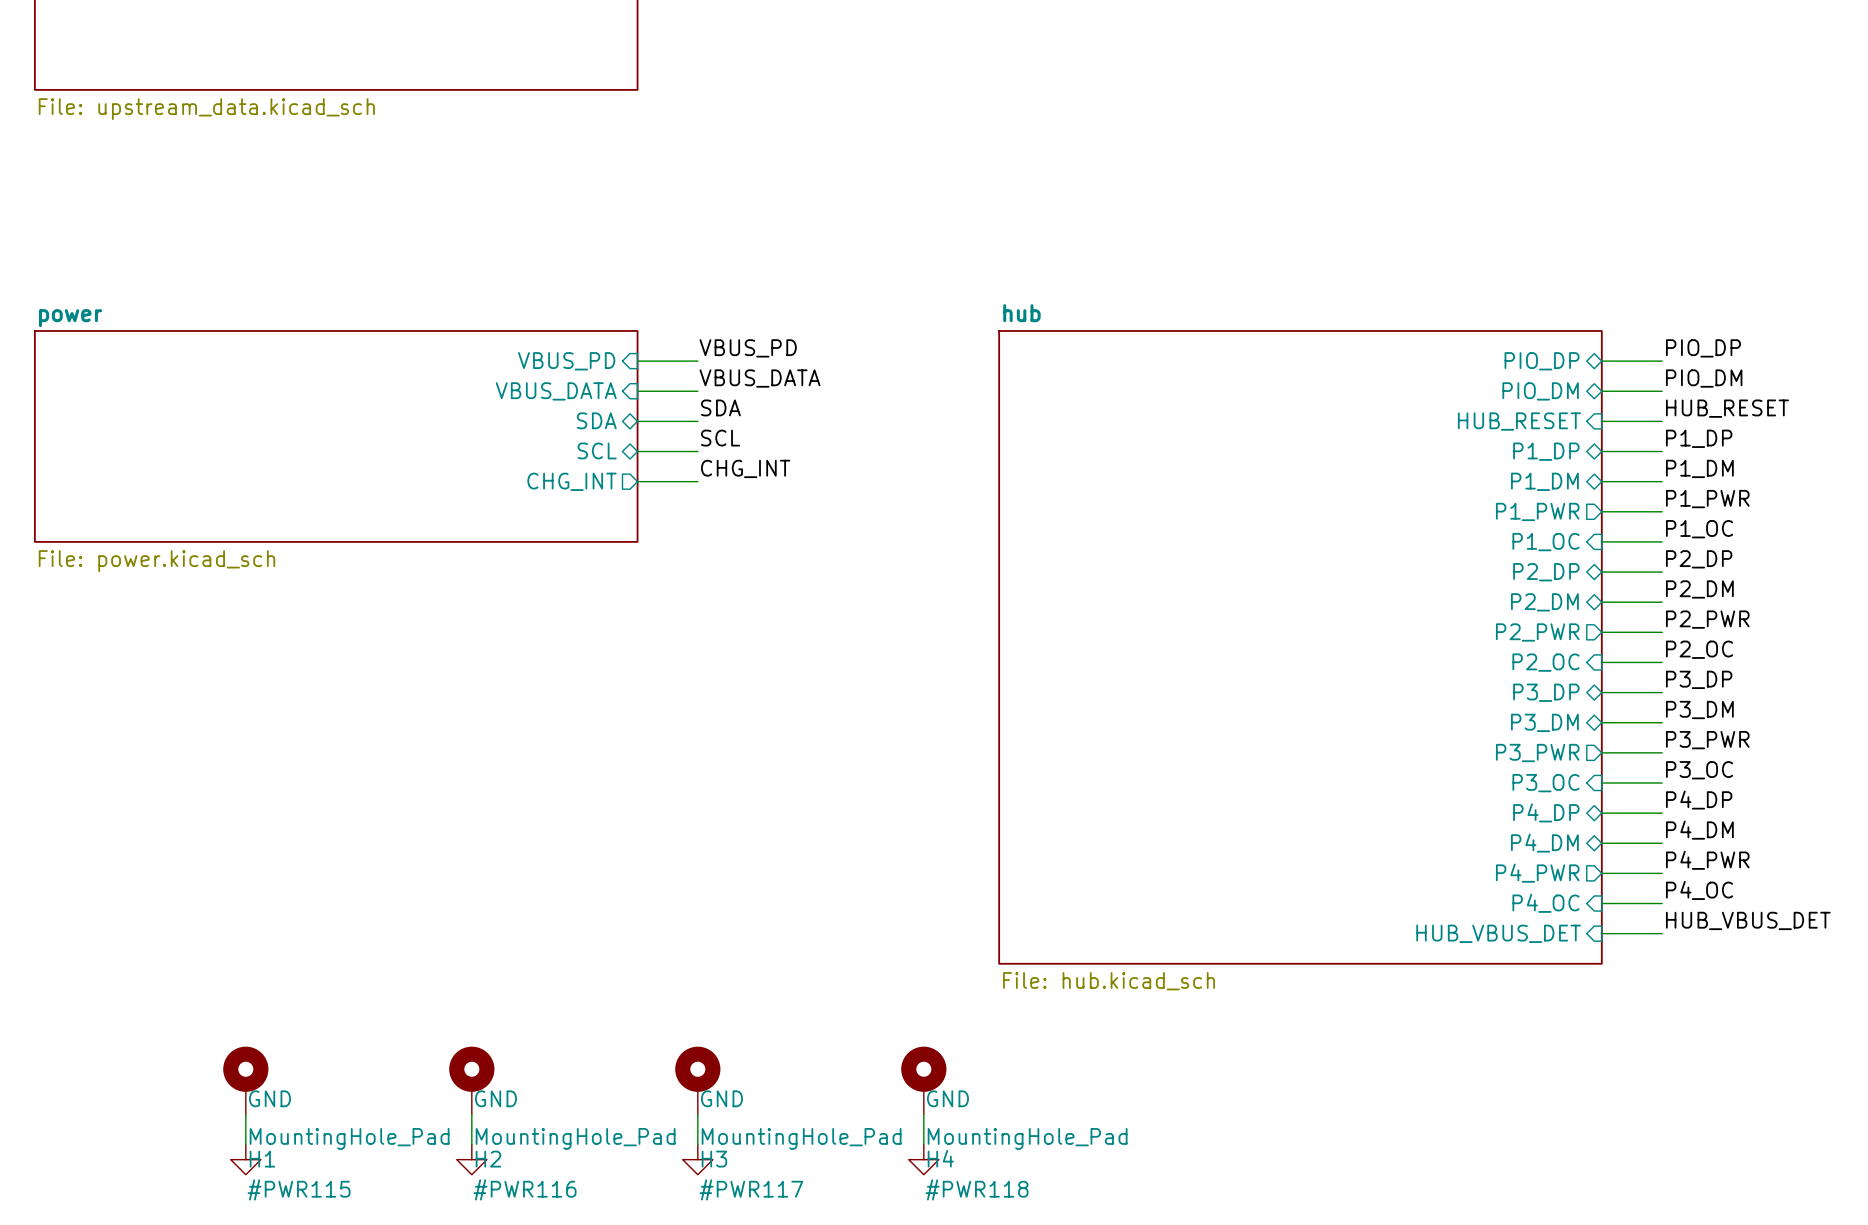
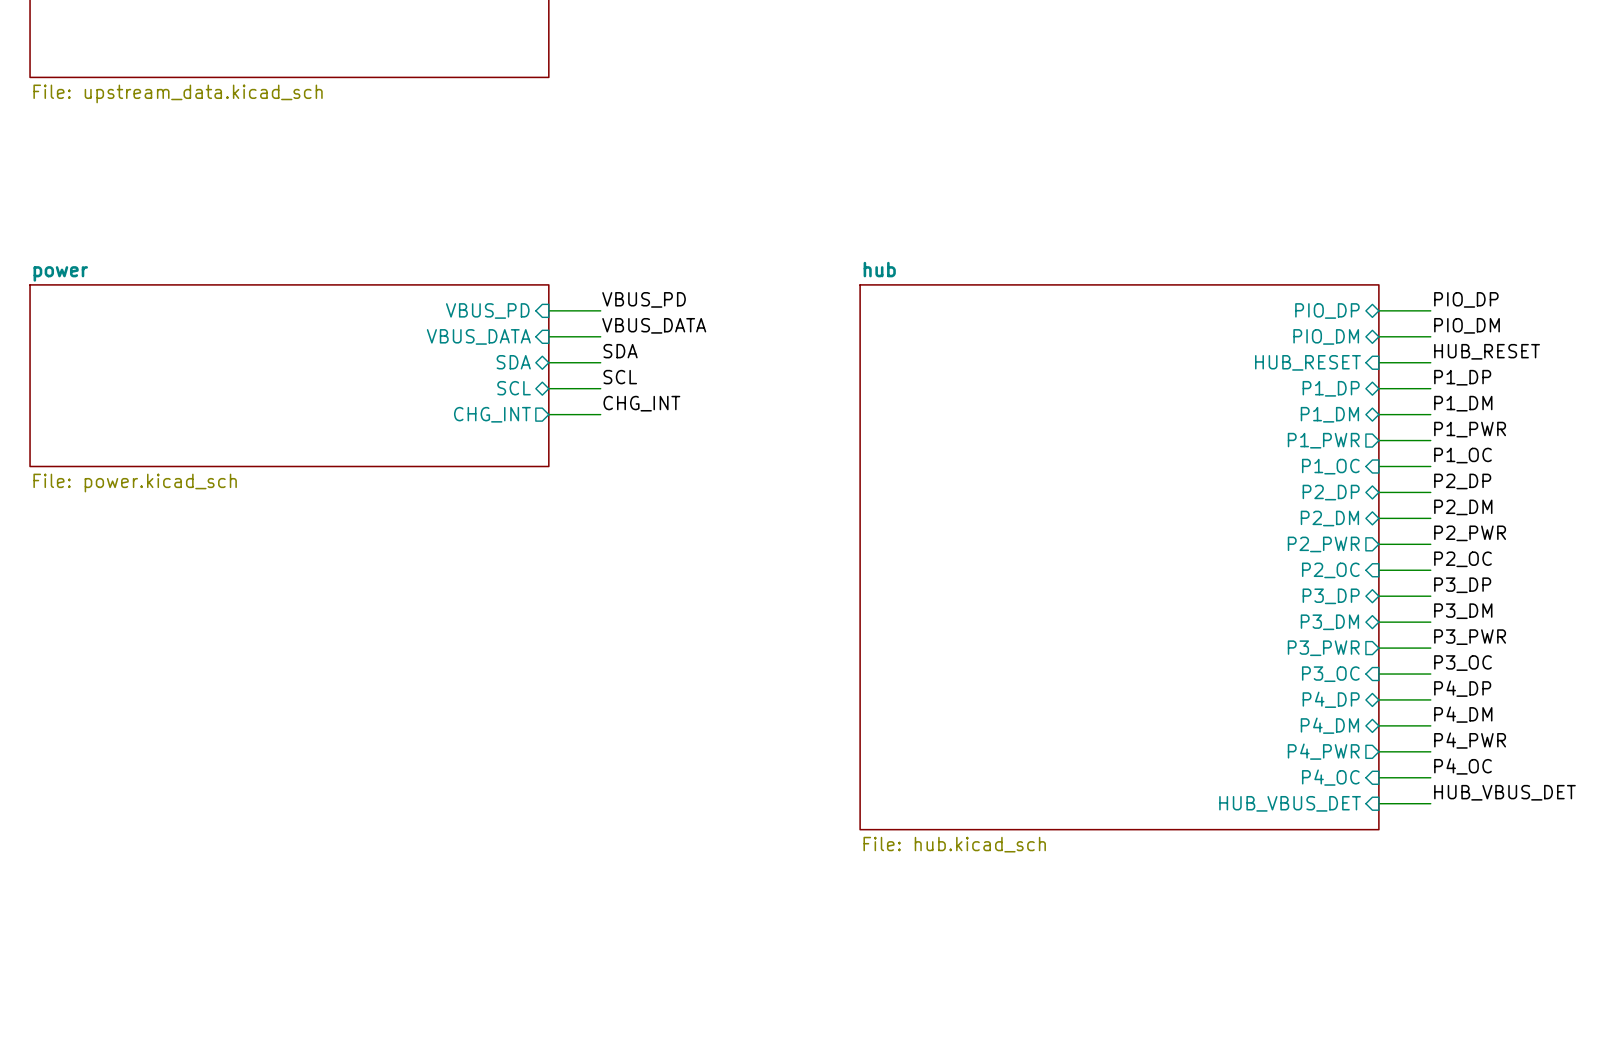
H1: MountingHole_Pad (245, 1080) -> none
H2: MountingHole_Pad (471, 1080) -> none
H3: MountingHole_Pad (697, 1080) -> none
H4: MountingHole_Pad (923, 1080) -> none
wire: (245, 1114) (245, 1144) -> none
wire: (471, 1114) (471, 1144) -> none
wire: (697, 1114) (697, 1144) -> none
wire: (923, 1114) (923, 1144) -> none
#PWR115: GND (245, 1159) -> none
#PWR116: GND (471, 1159) -> none
#PWR117: GND (697, 1159) -> none
#PWR118: GND (923, 1159) -> none

